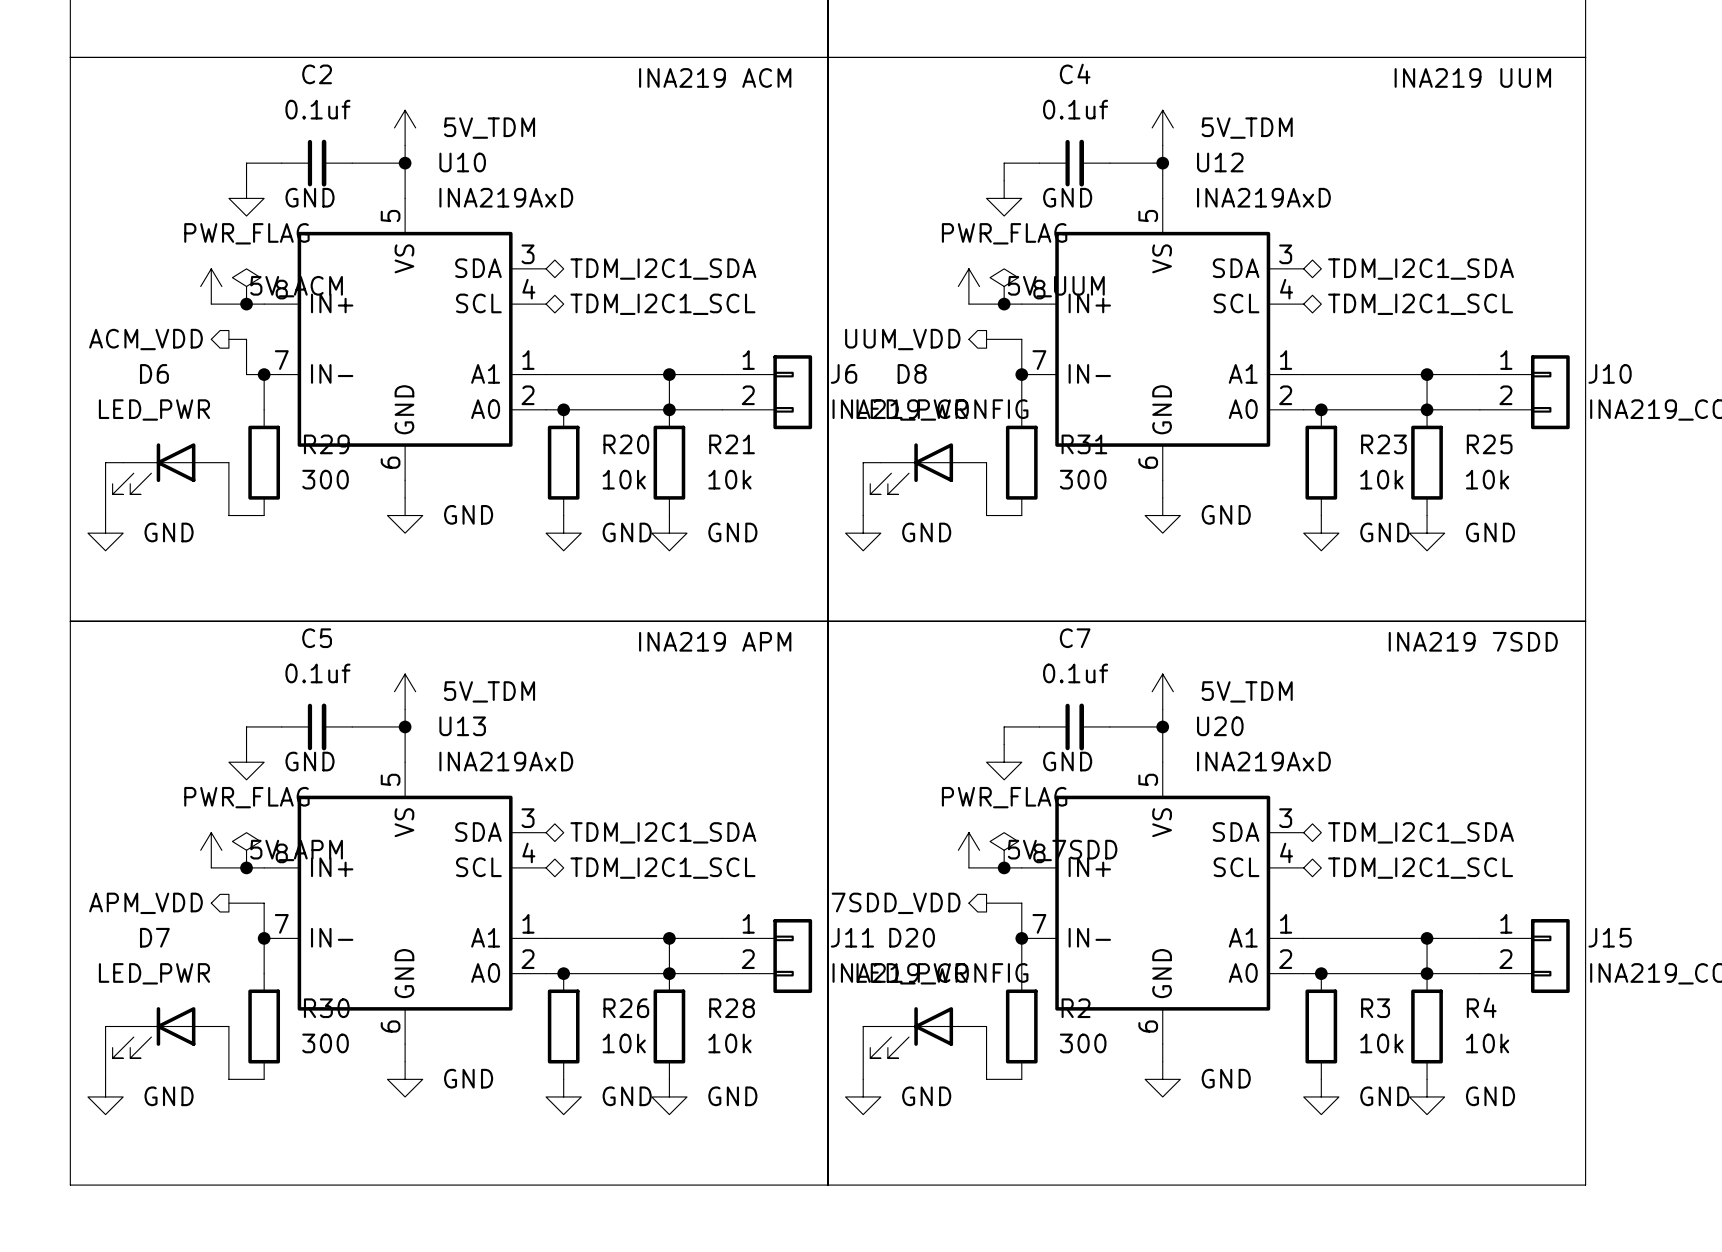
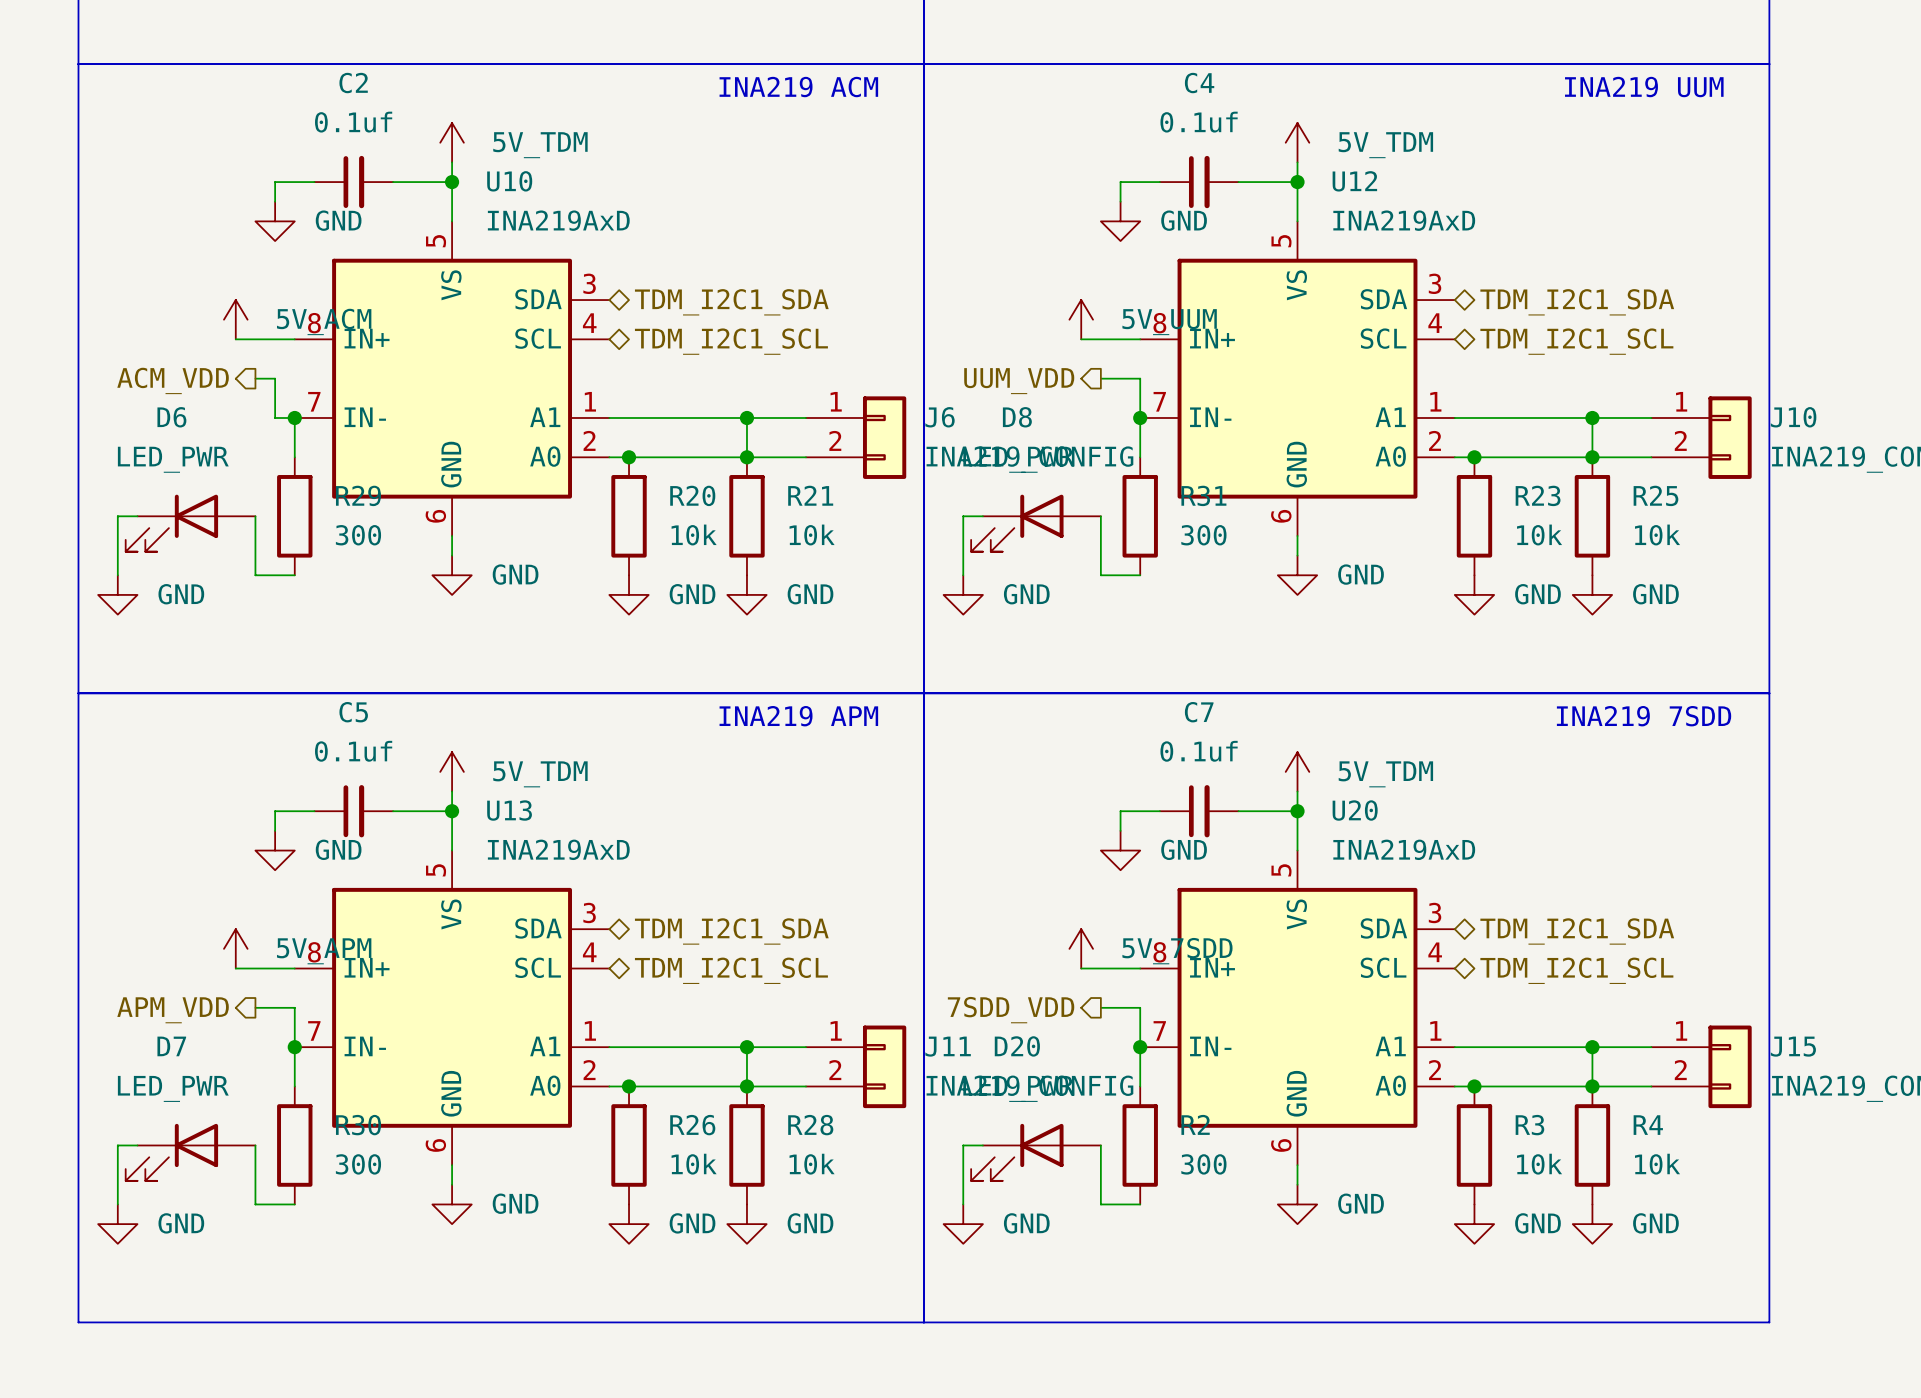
power symbol: PWR_FLAG (246, 286) -> none
power symbol: PWR_FLAG (1004, 286) -> none
junction: (246, 304) -> none
junction: (1004, 304) -> none
power symbol: PWR_FLAG (246, 850) -> none
power symbol: PWR_FLAG (1004, 850) -> none
junction: (246, 867) -> none
junction: (1004, 867) -> none

